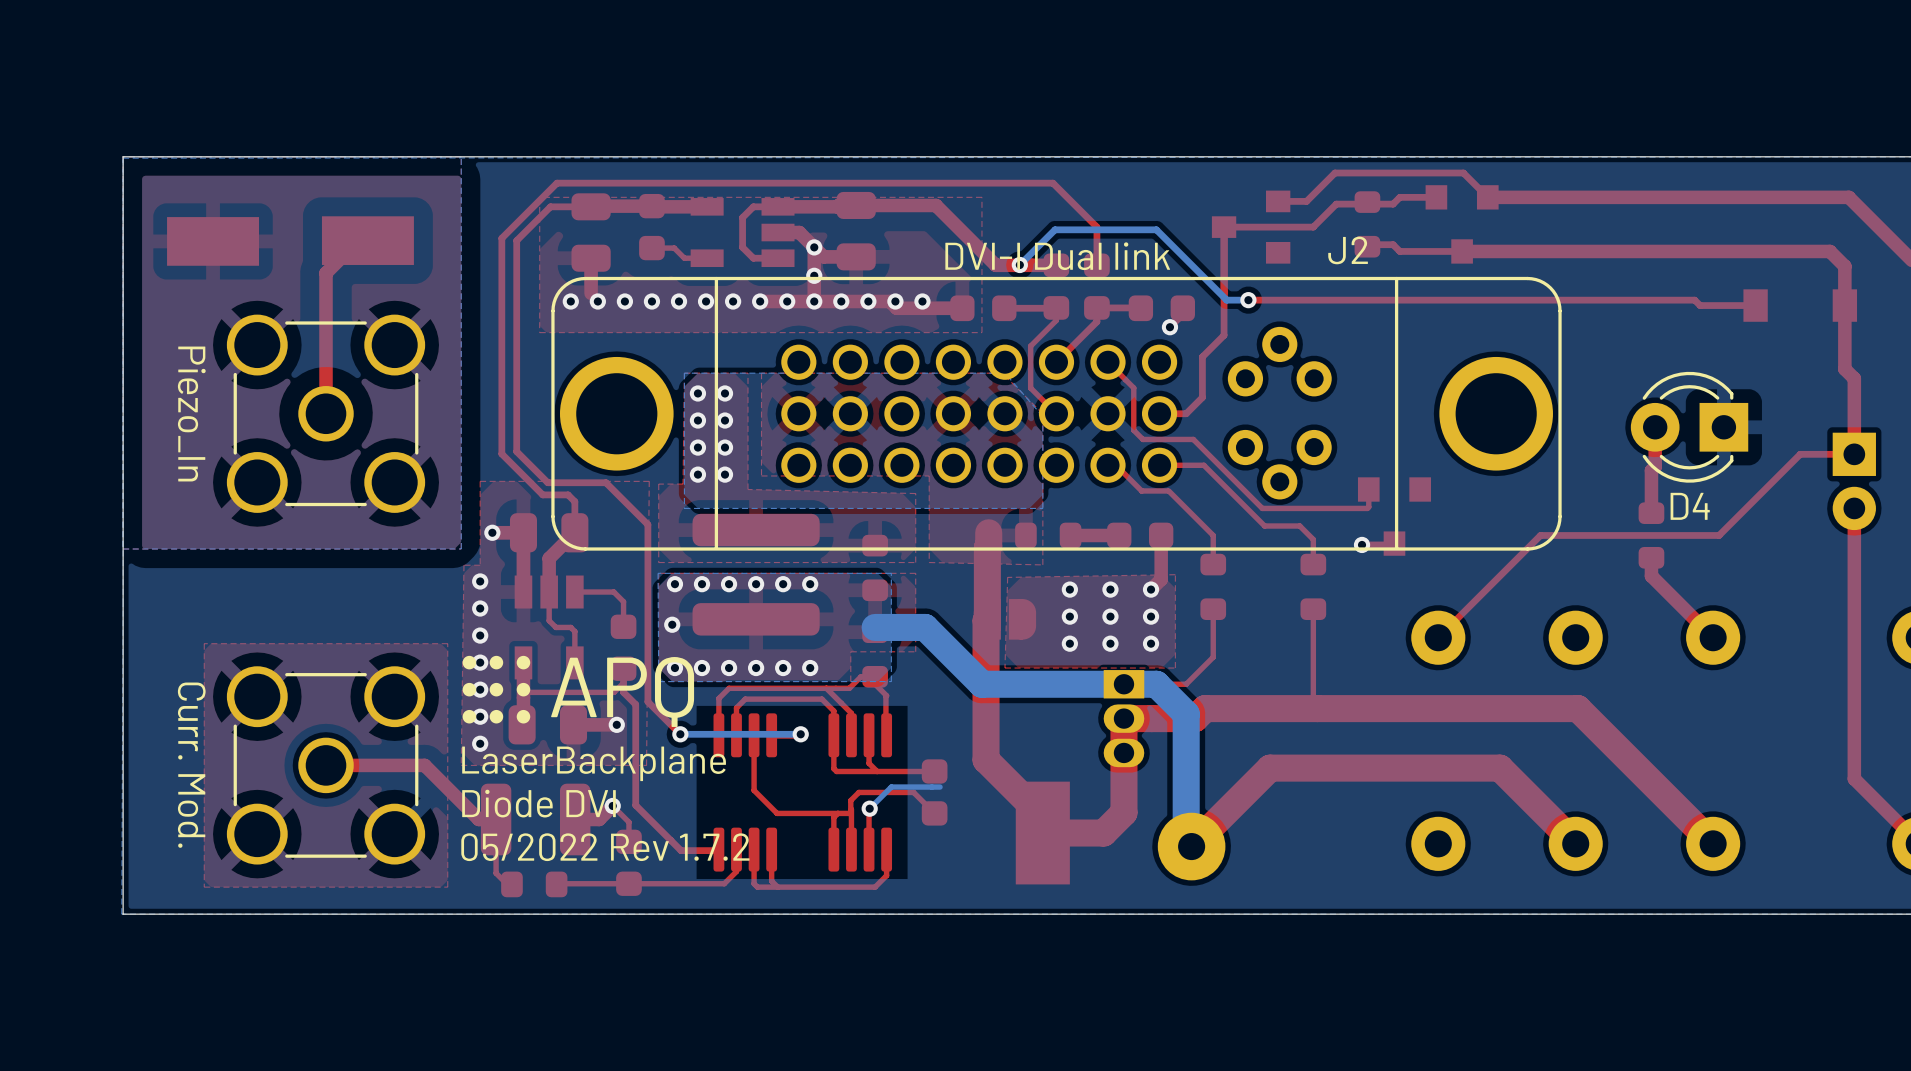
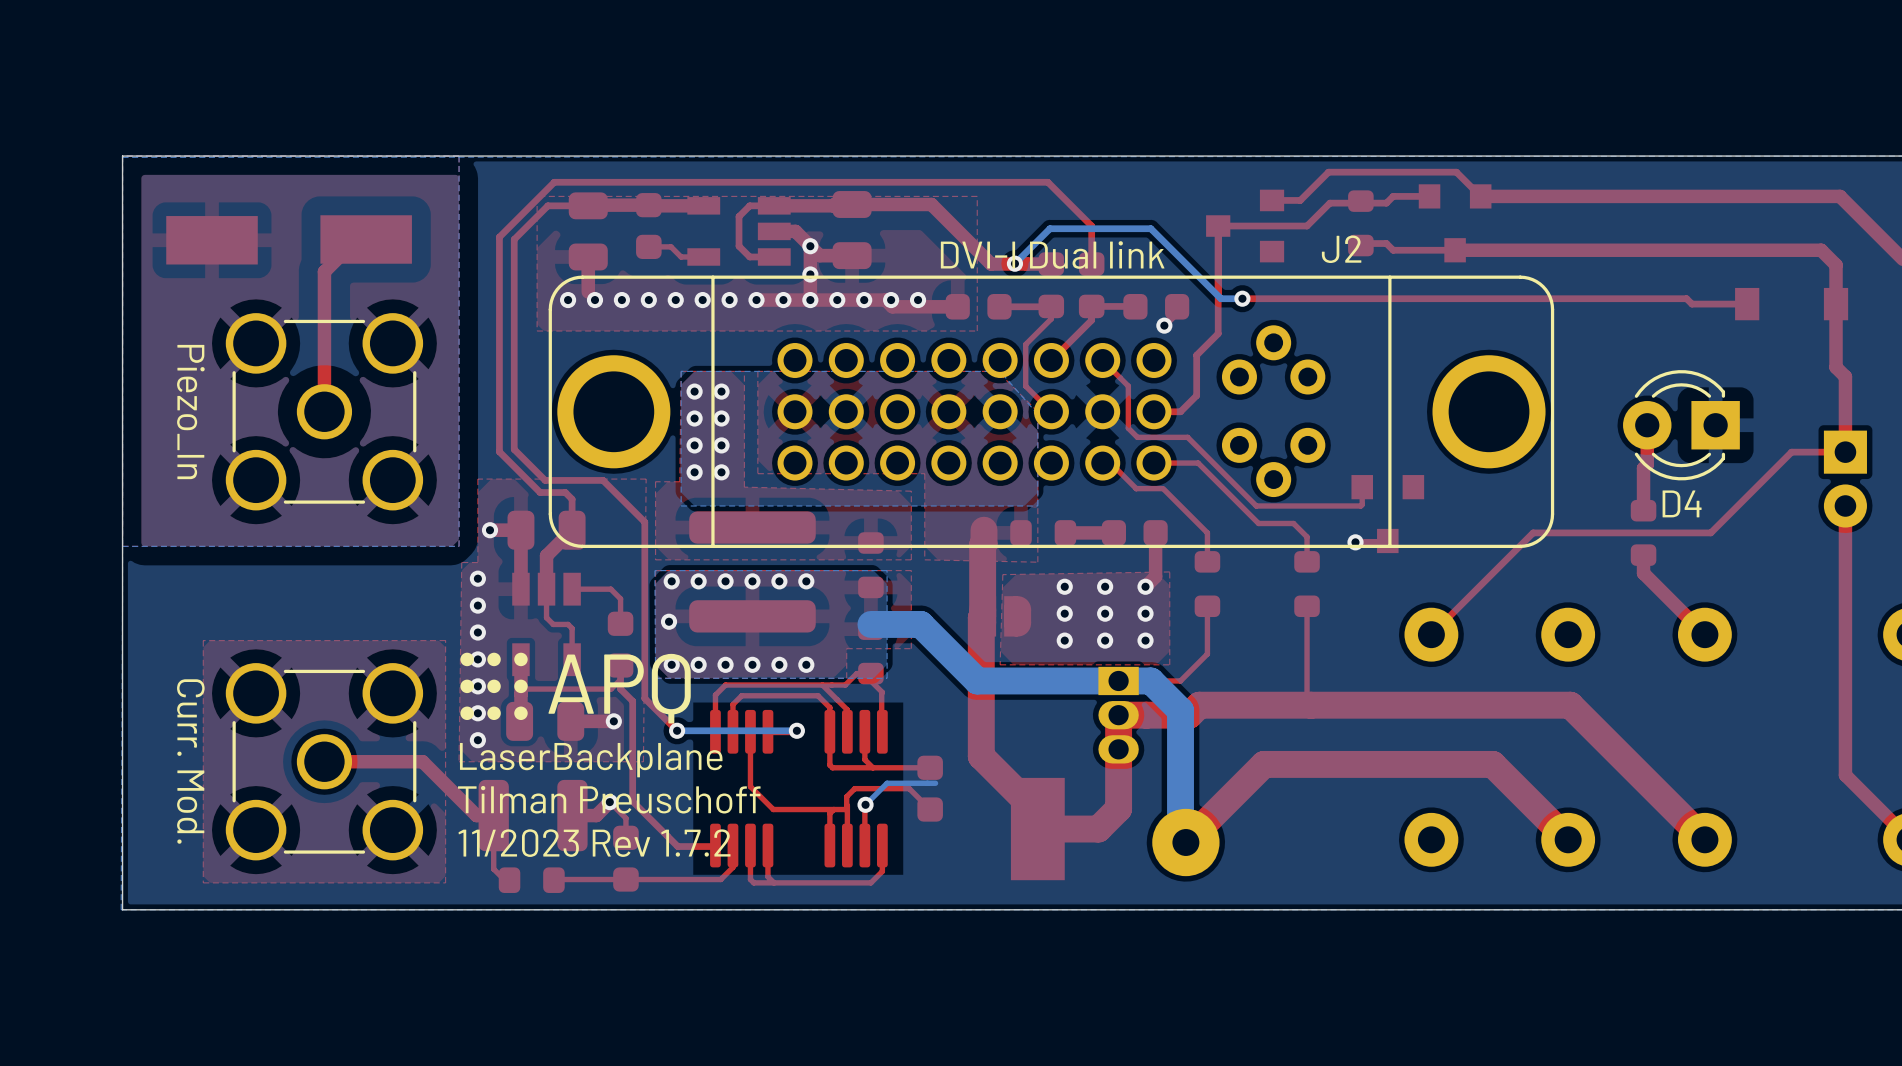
text: Diode DVI (538, 803) -> Tilman Preuschoff (609, 799)
text: 05/2022 Rev 1.7.2 (605, 847) -> 11/2023 Rev 1.7.2 (594, 843)

